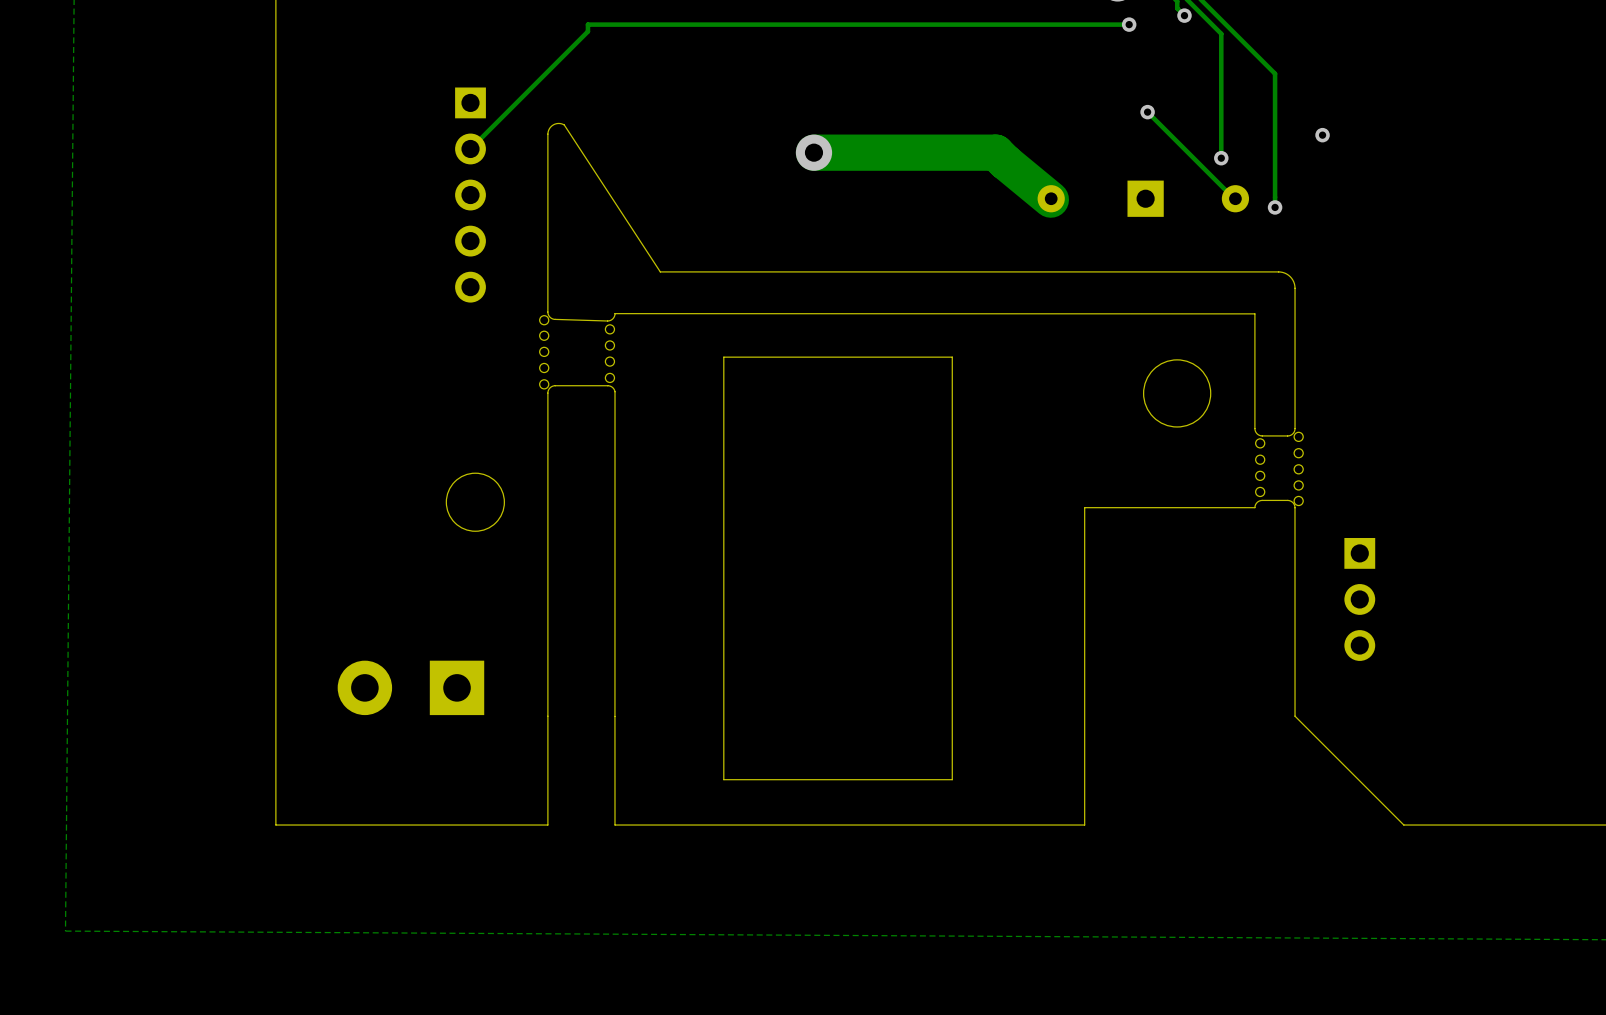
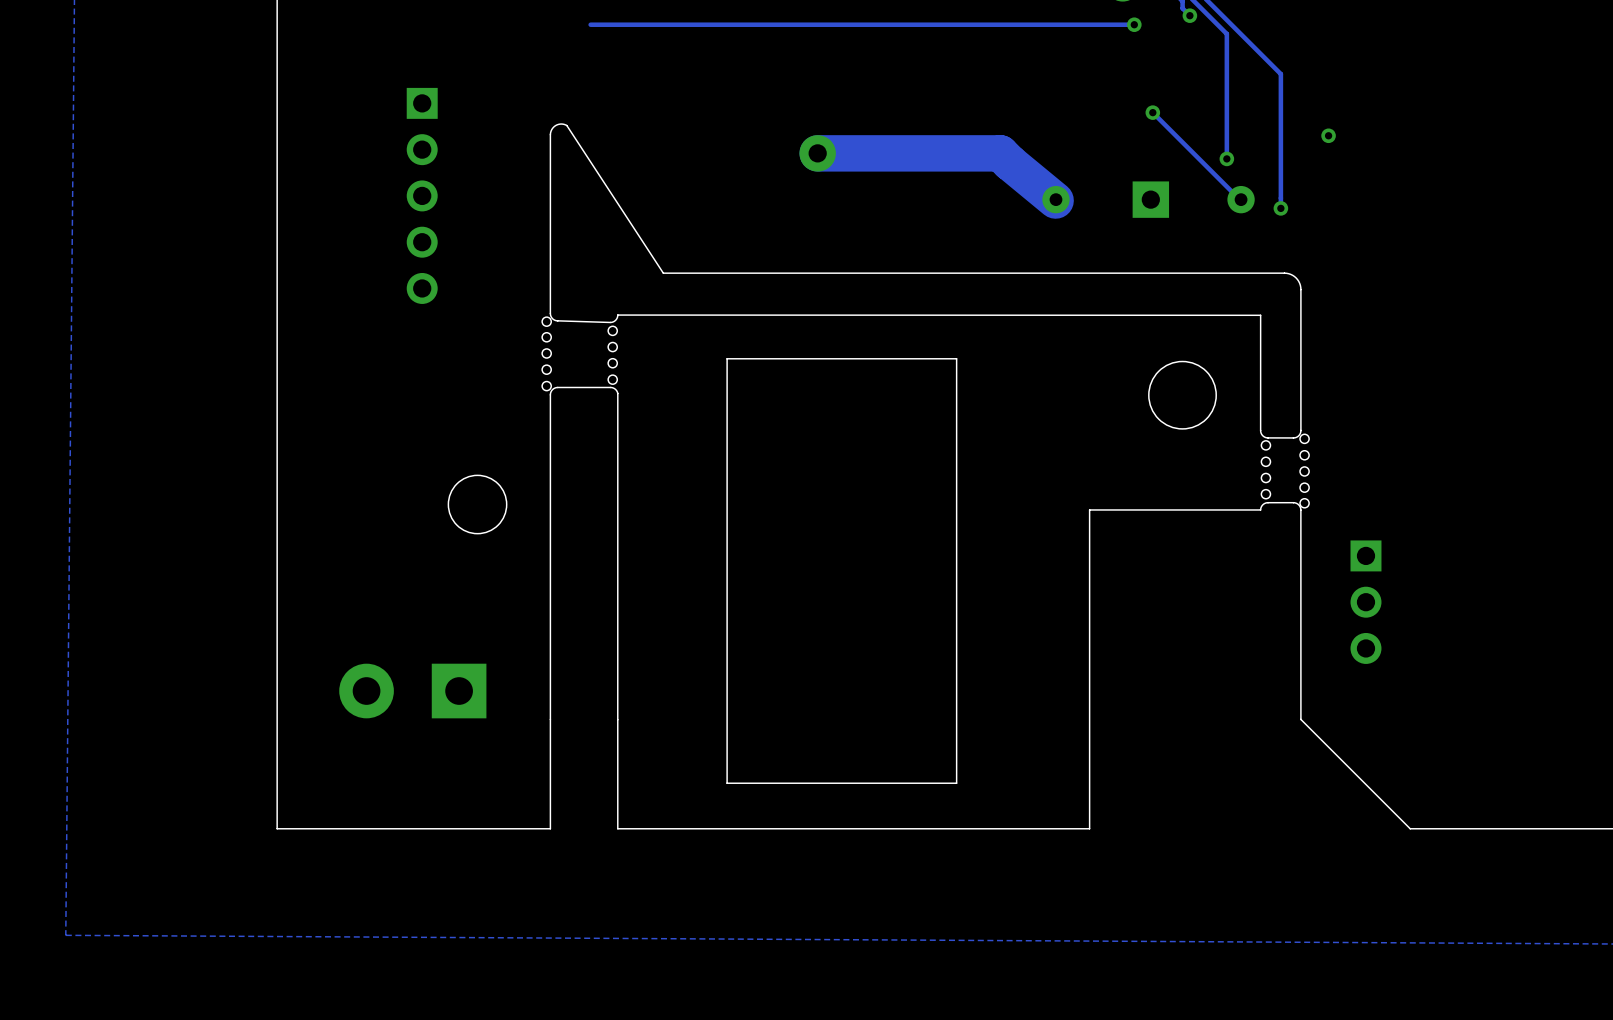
track: (587, 24) (587, 31) (470, 148) -> none
part position: (470, 195) -> (422, 195)

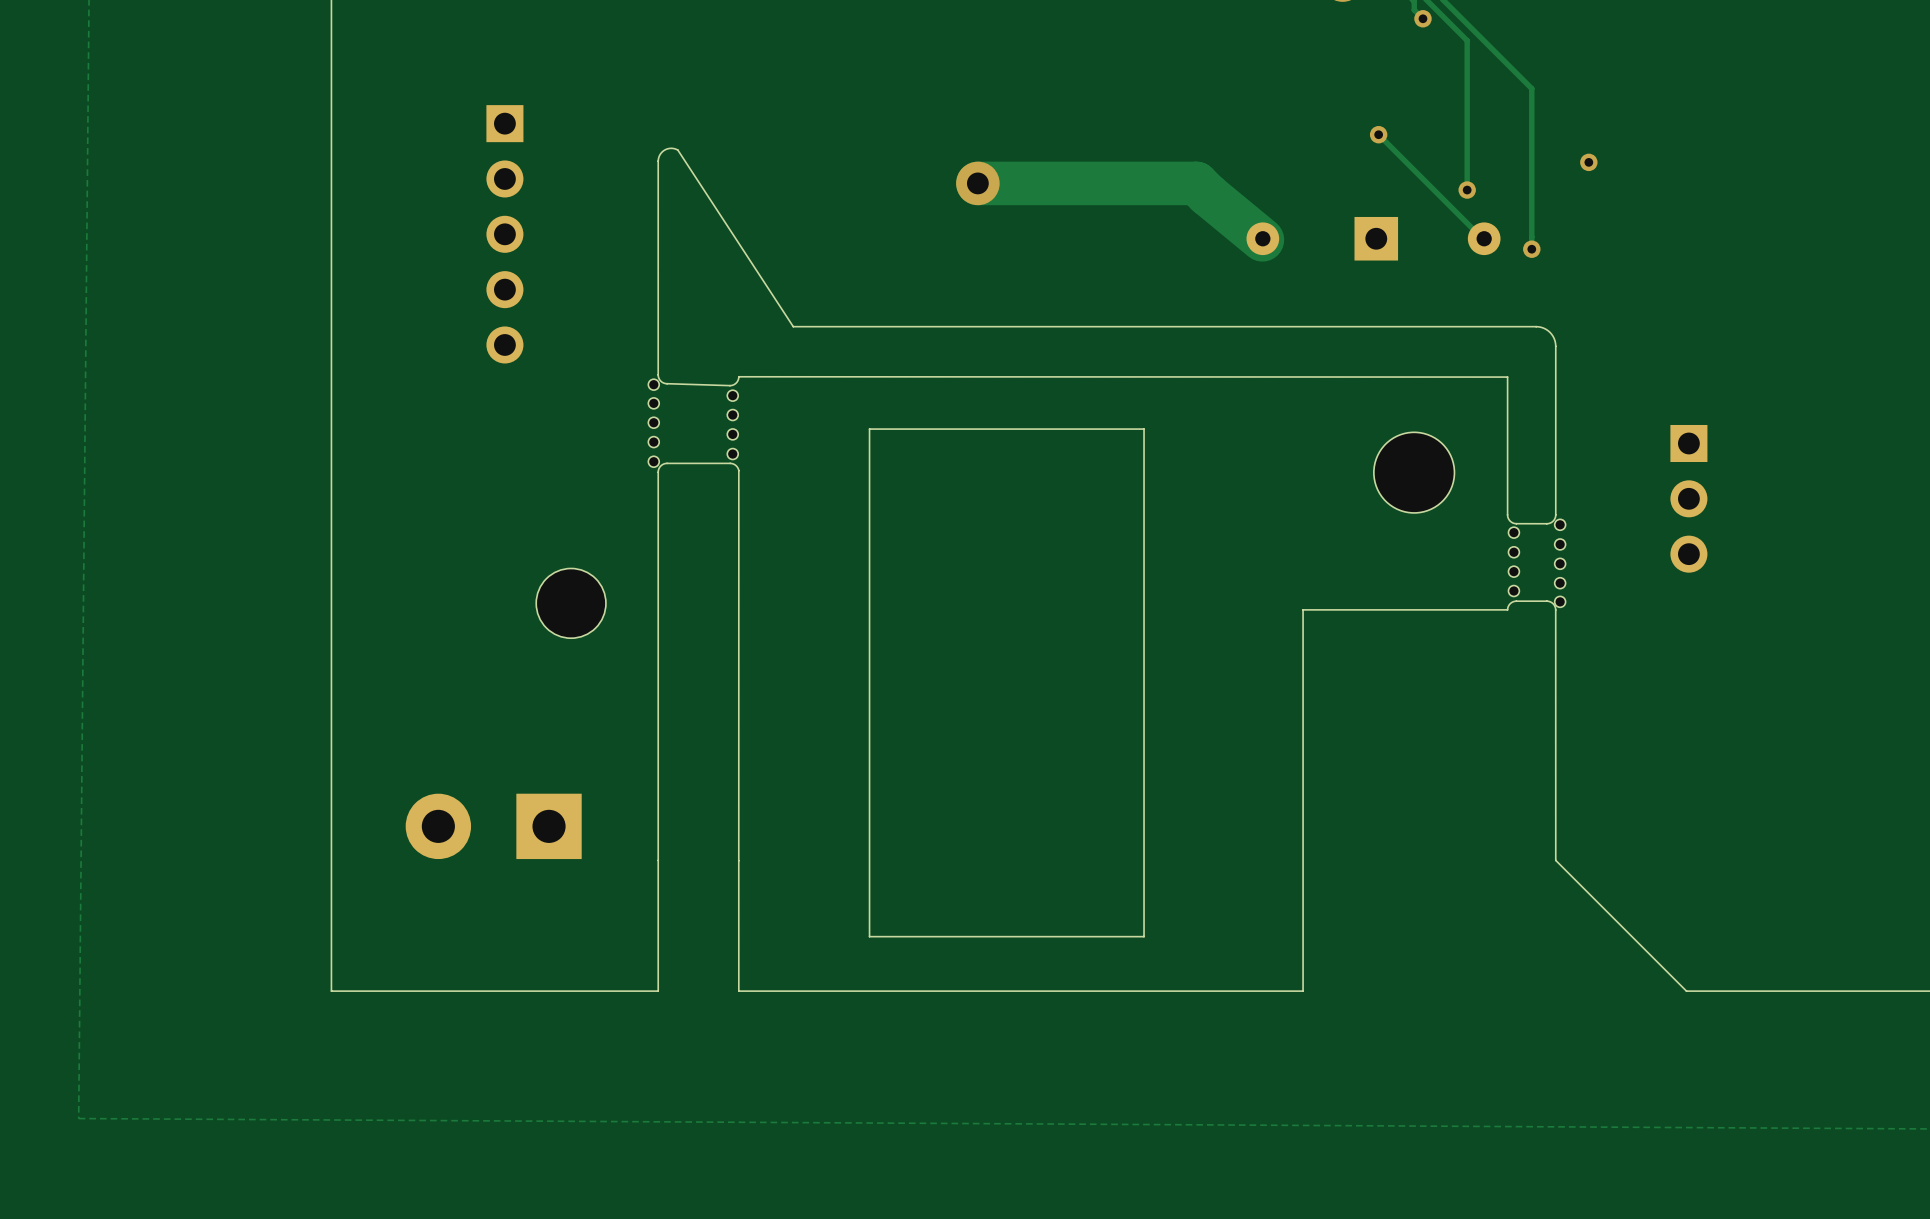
track: (1134, 24) (590, 24) -> none
via: (1134, 24) -> none
part position: (1365, 602) -> (1688, 498)

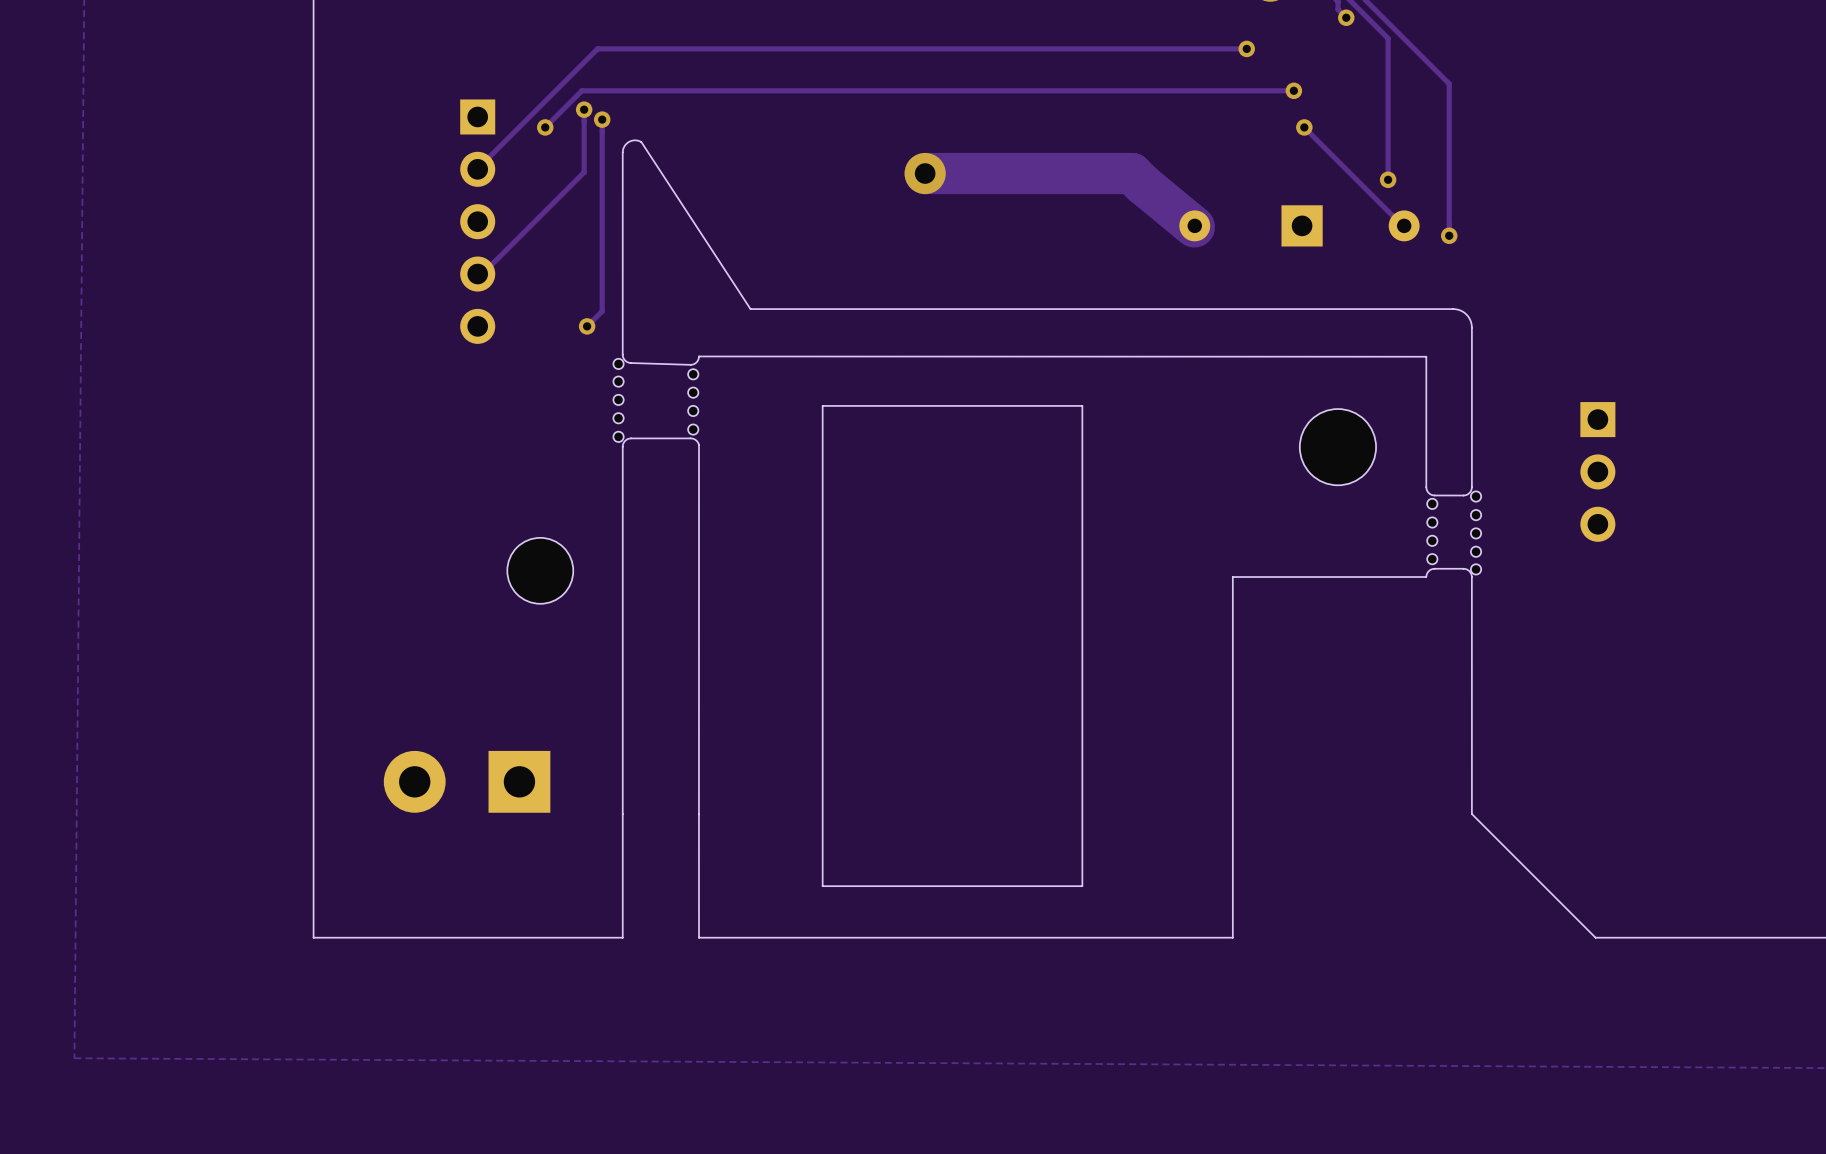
track: none -> (1246, 48) (597, 48) (477, 169)
via: none -> (1246, 48)
track: none -> (1293, 90) (581, 90) (545, 127)
via: none -> (1293, 90)
track: none -> (584, 109) (584, 172) (482, 274)
via: none -> (584, 109)
track: none -> (602, 119) (602, 311) (587, 326)
via: none -> (602, 119)
via: none -> (545, 127)
via: (1588, 162) -> none
via: none -> (587, 326)

